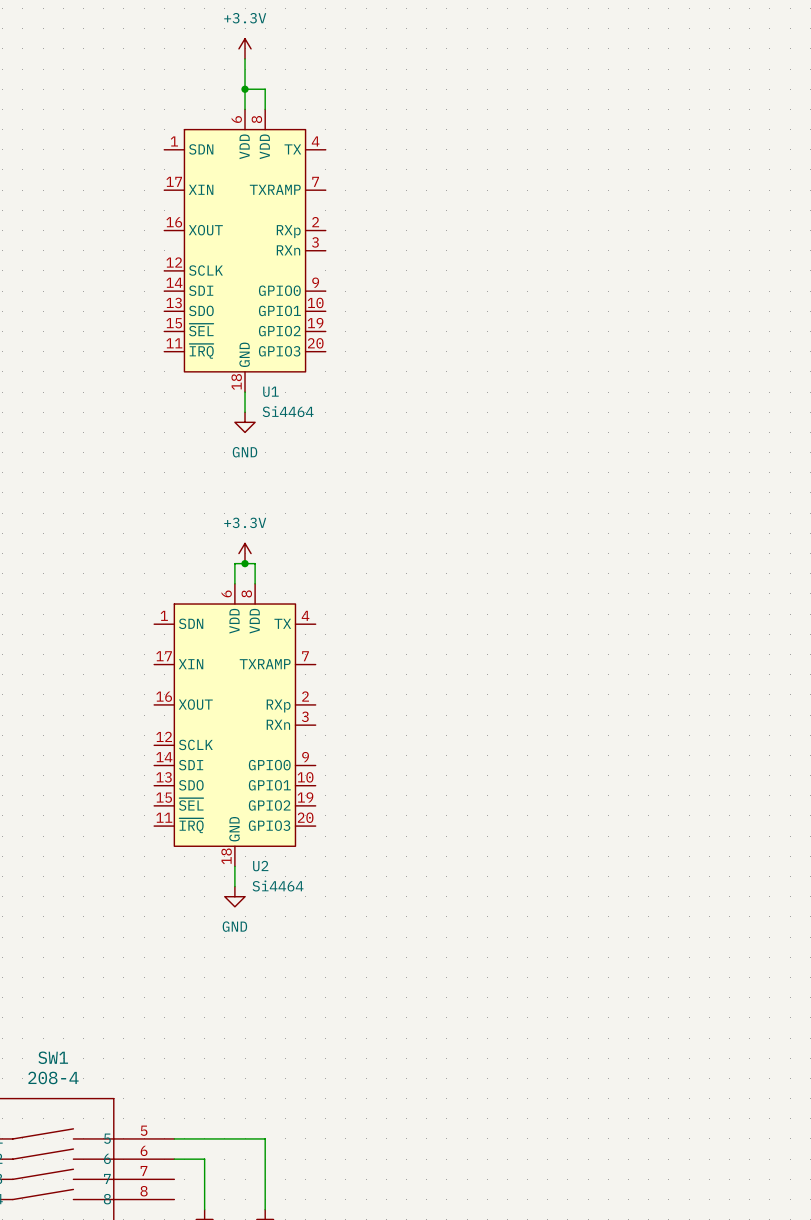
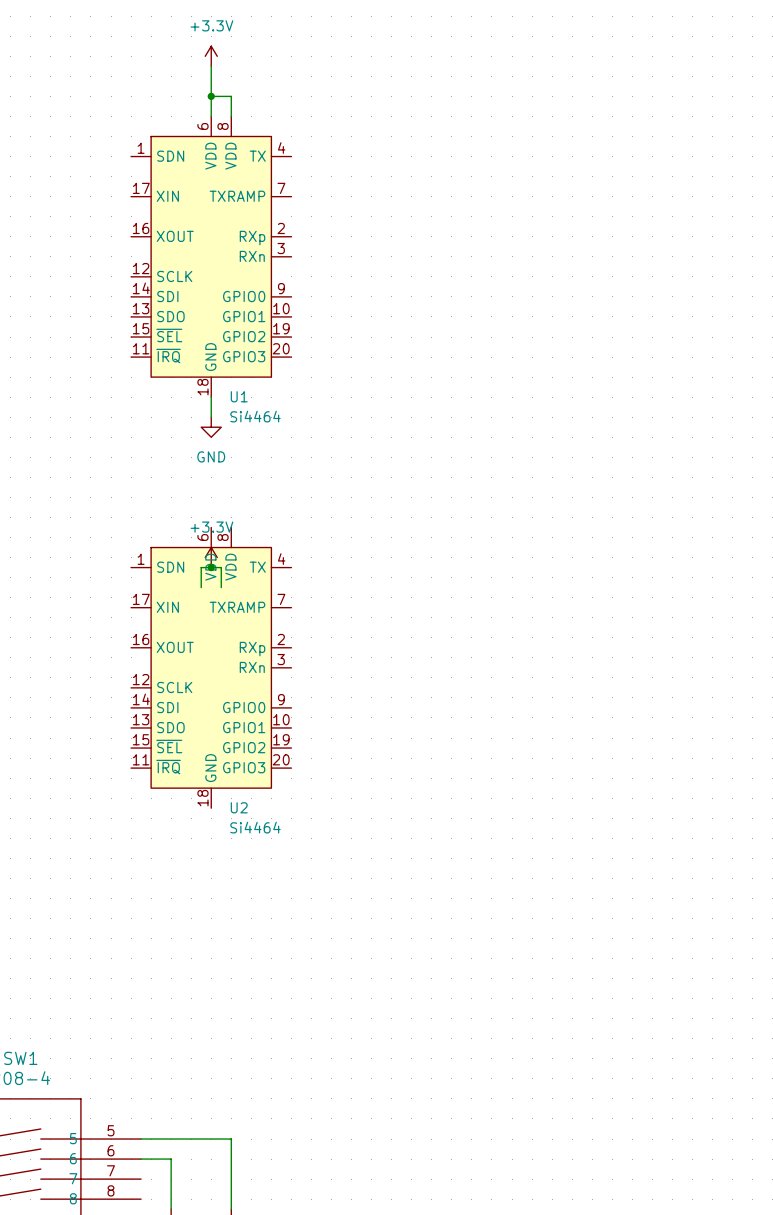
U2 position: (234, 725) -> (211, 667)
wire: (234, 866) (234, 886) -> none
power symbol: GND (234, 896) -> none

